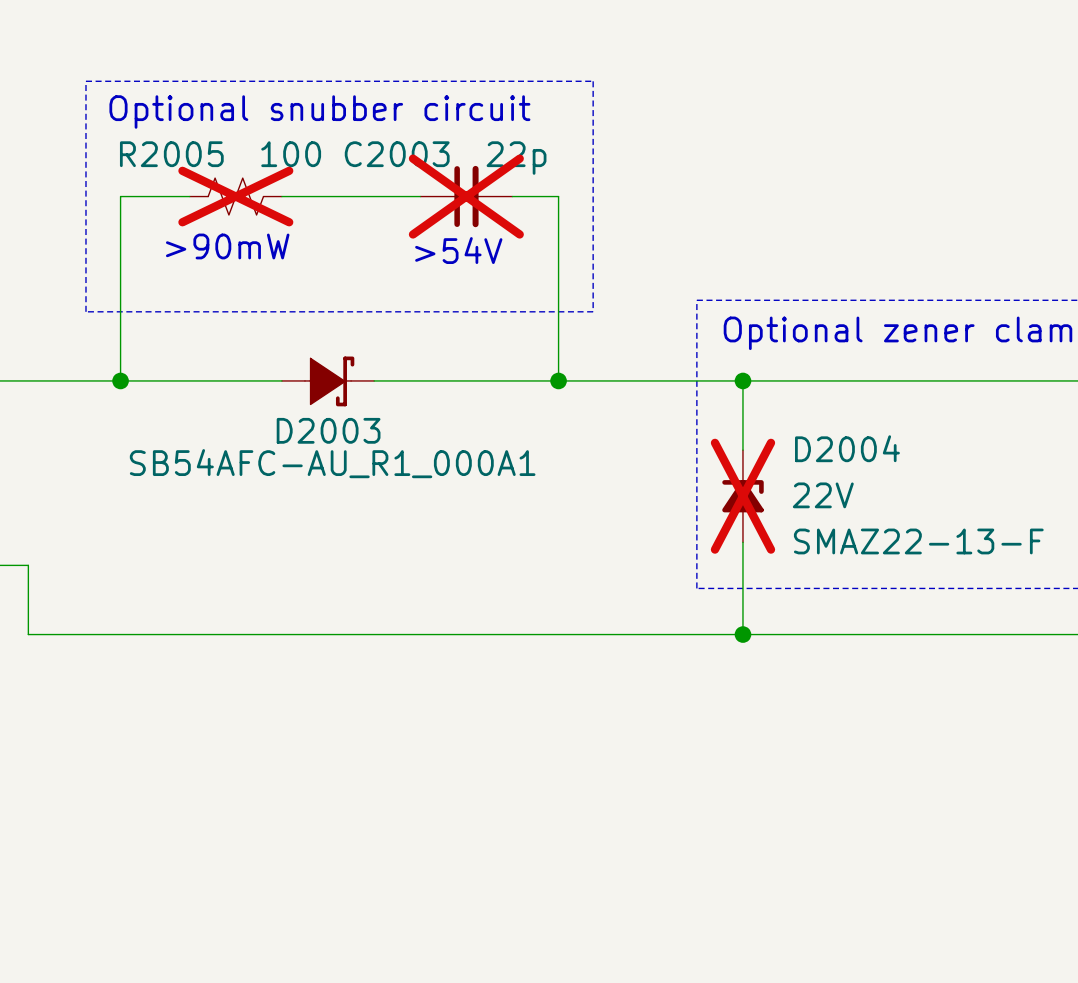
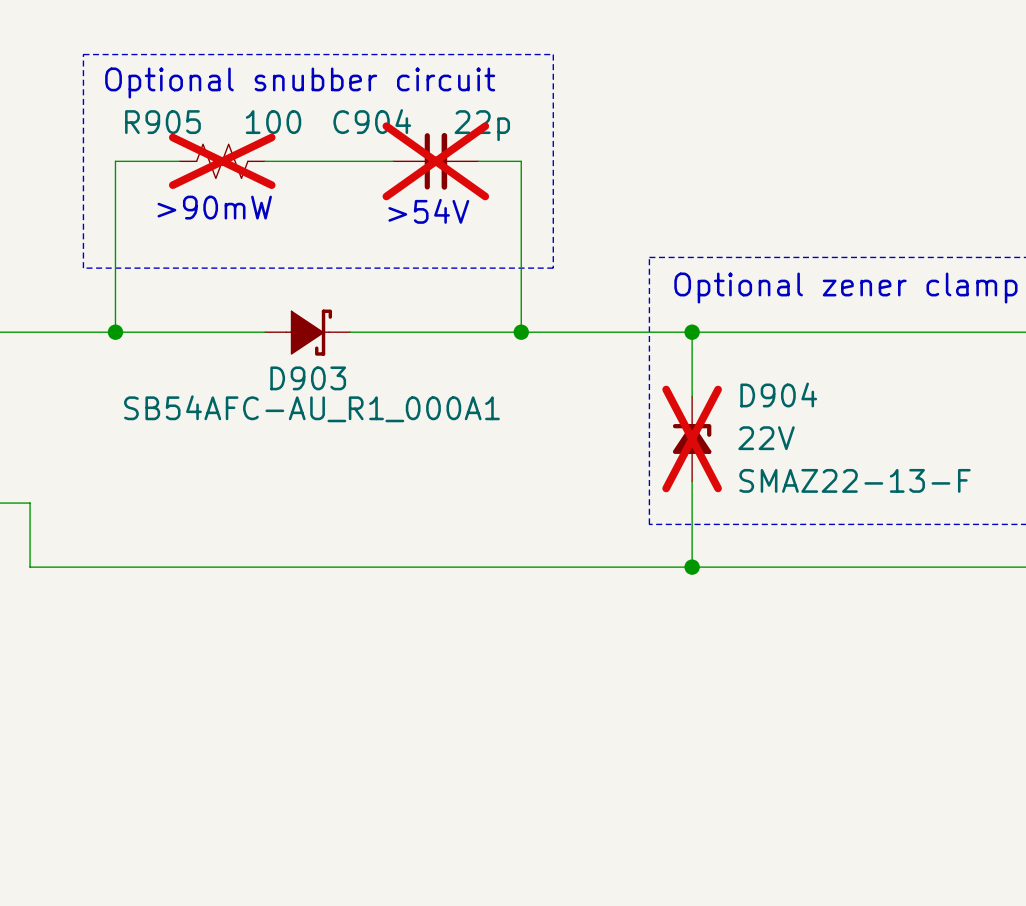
R2005 name: R2005 (171, 154) -> R905 (162, 122)
C2003 name: C2003 (397, 154) -> C904 (372, 121)
D2003 name: D2003 (328, 430) -> D903 (308, 378)
D2004 name: D2004 (847, 448) -> D904 (778, 394)

